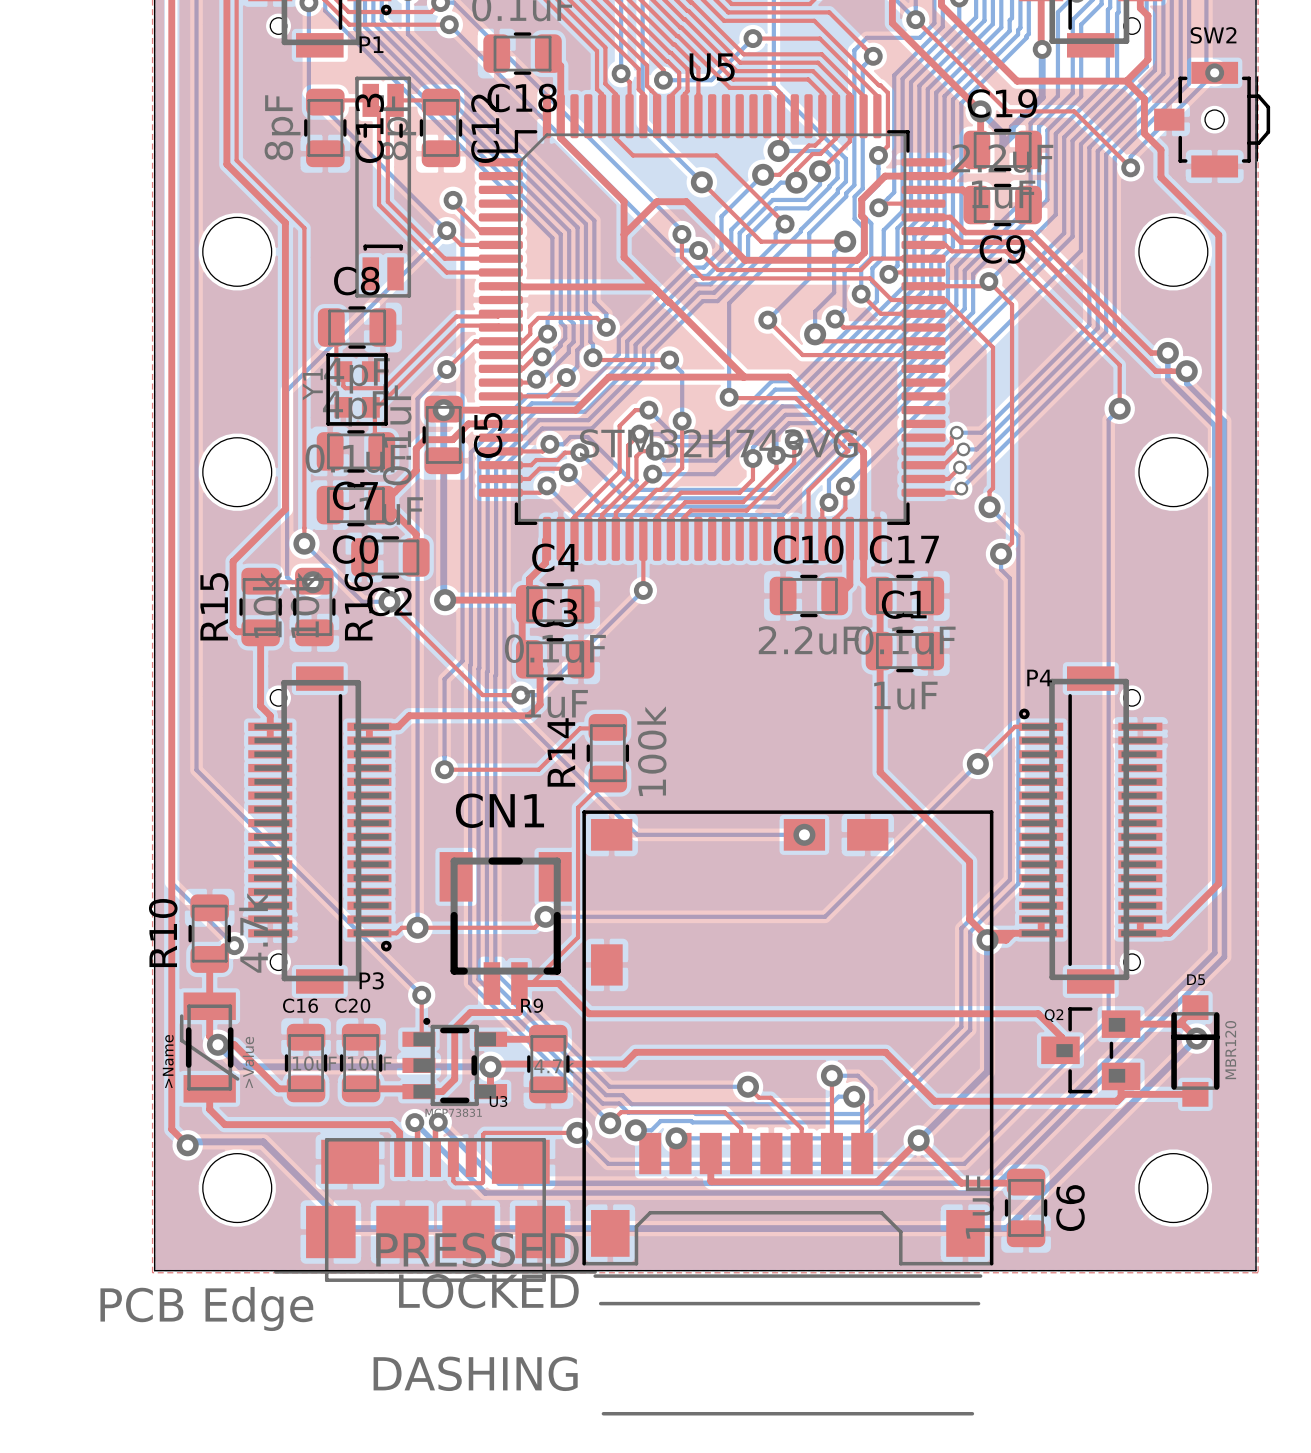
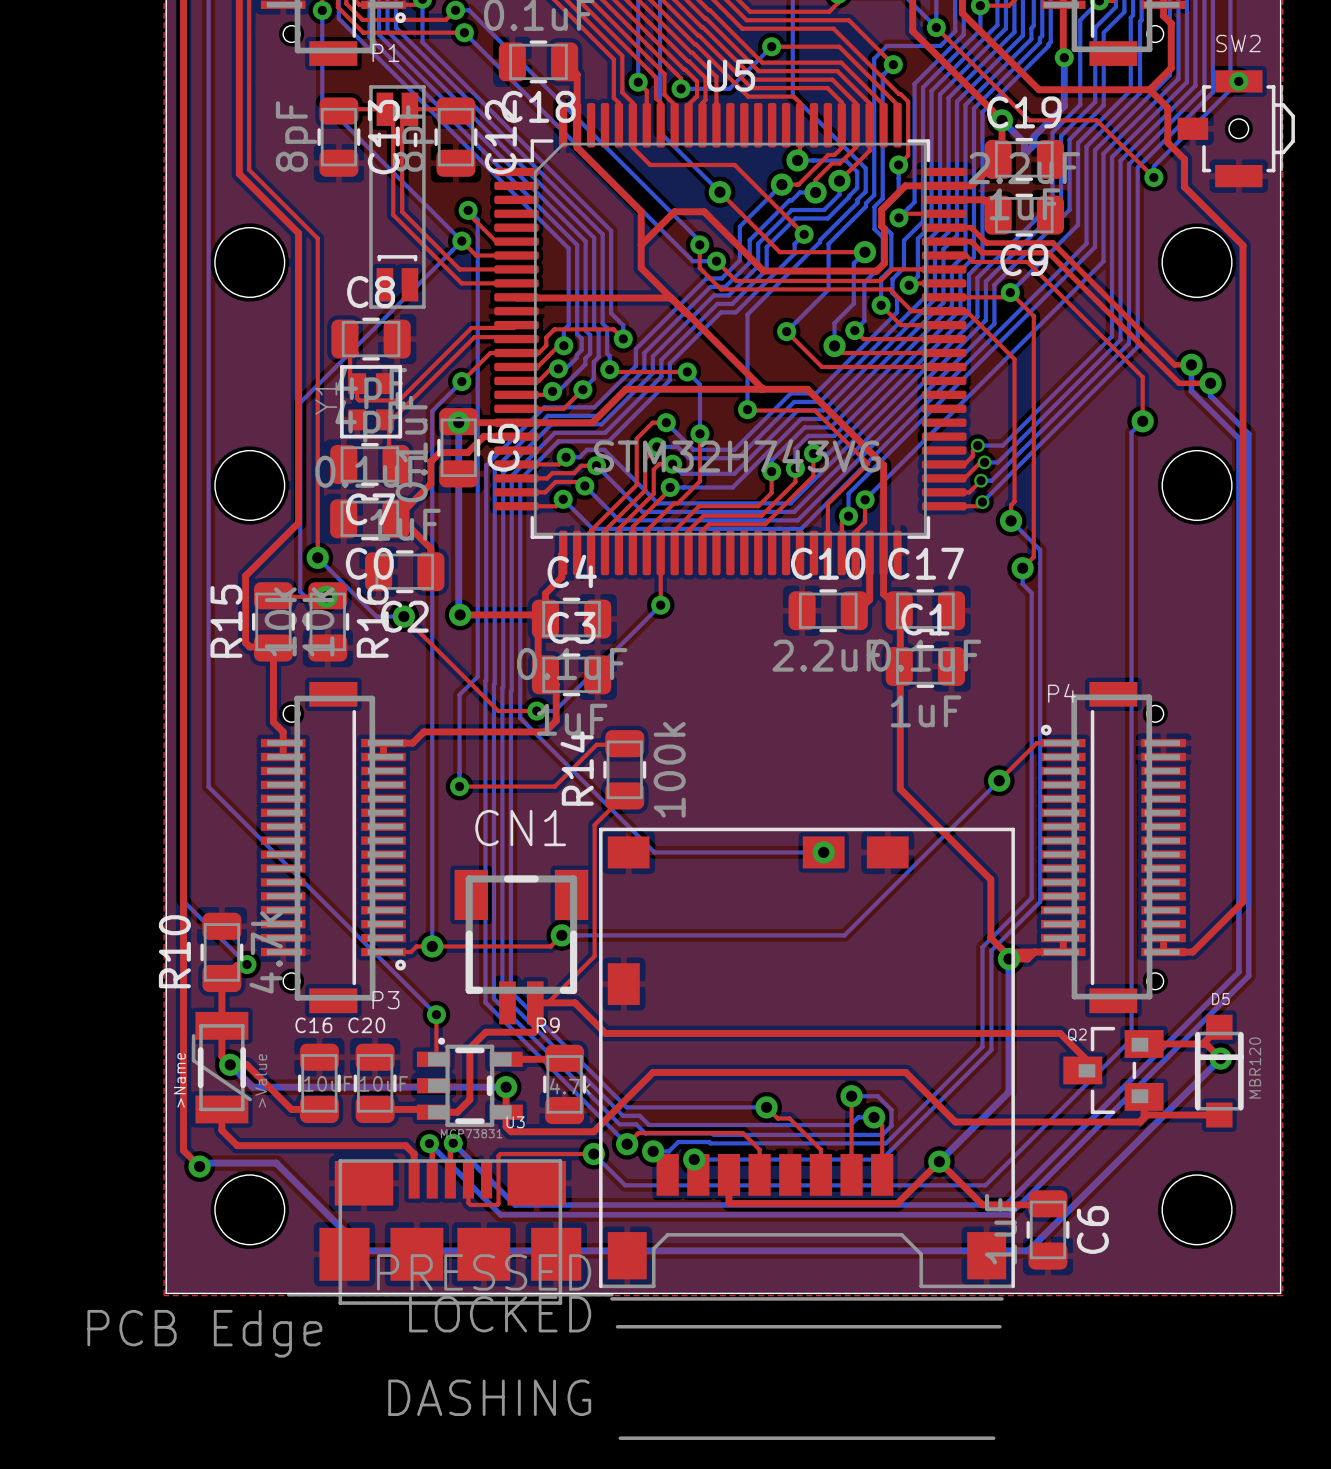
top track: (624, 1064) (493, 1064) (490, 1066) -> (641, 1084) (593, 1131) (511, 1131) (506, 1126) (506, 1112)

